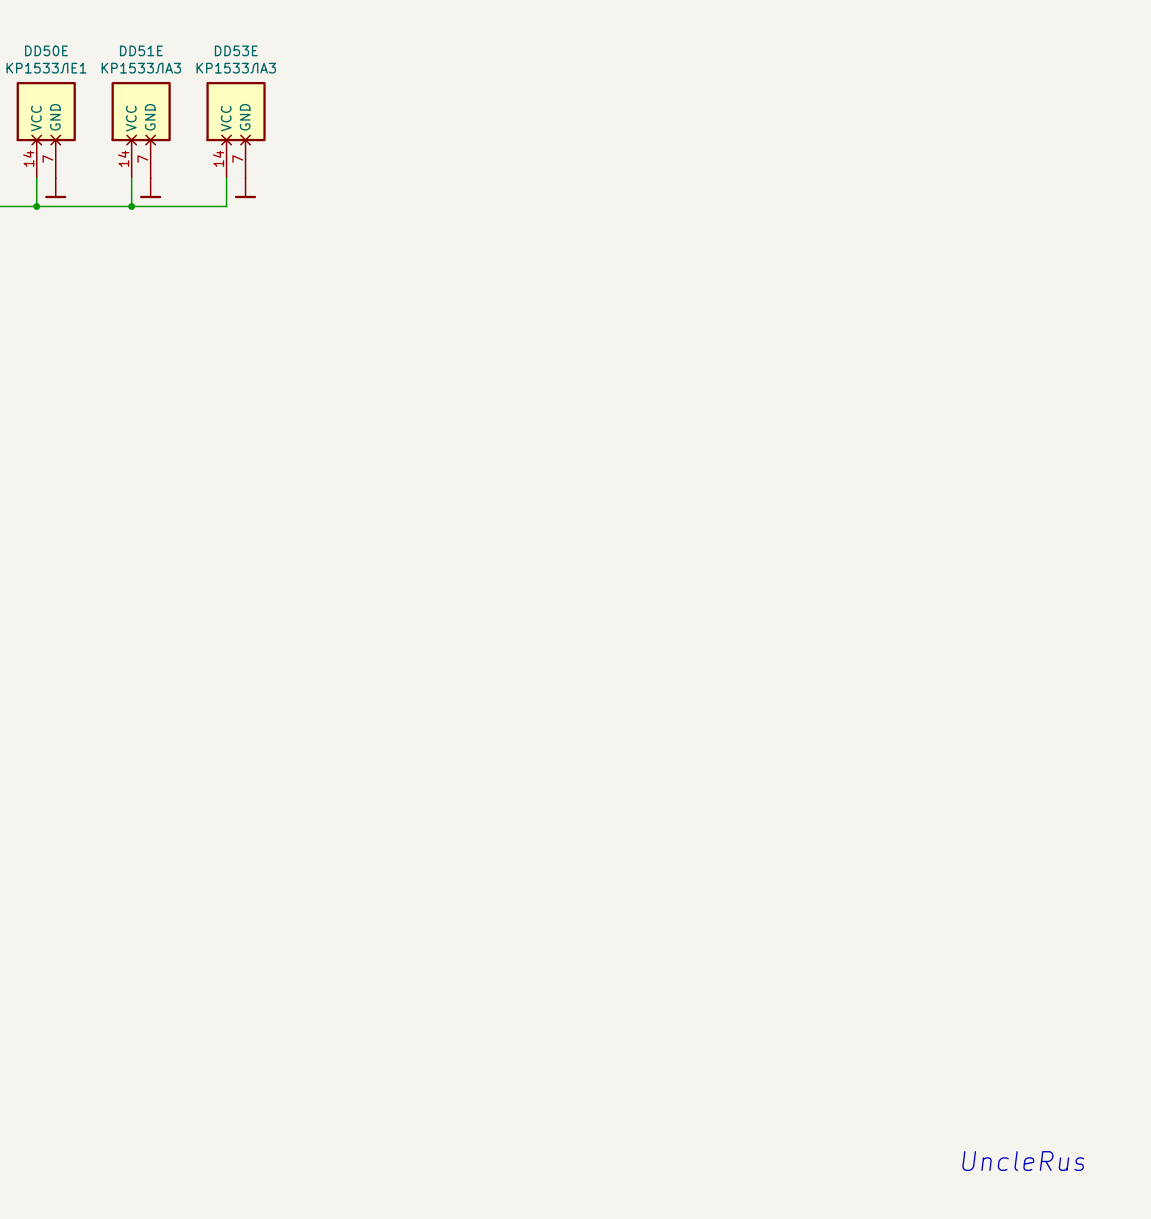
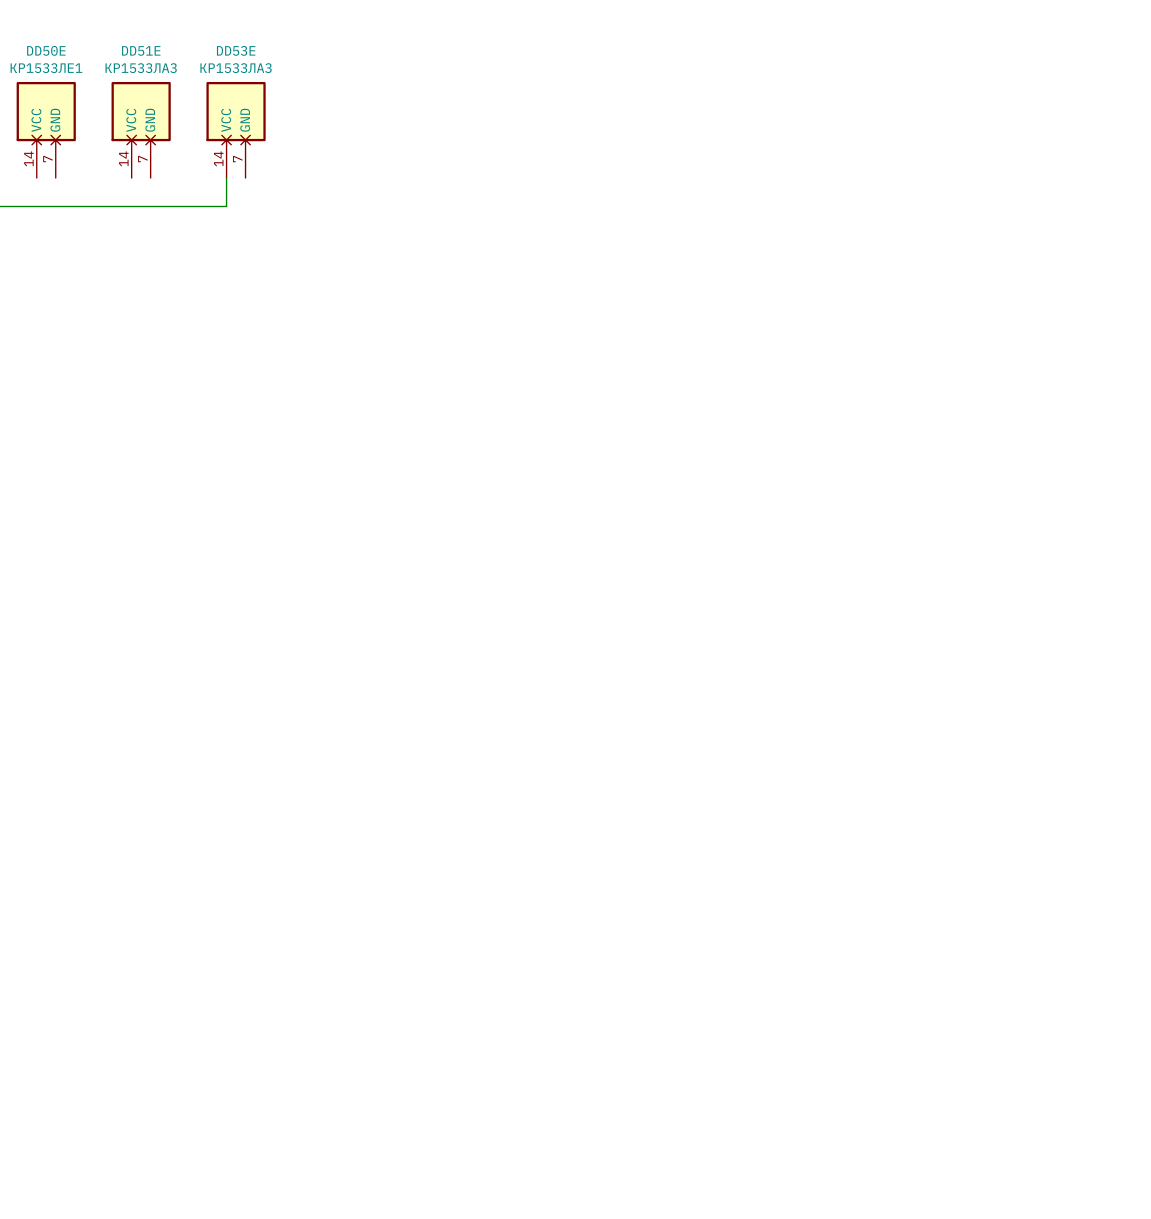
wire: (36, 178) (36, 206) -> none
wire: (131, 178) (131, 206) -> none
power symbol: (55, 188) -> none
power symbol: (150, 188) -> none
power symbol: (245, 188) -> none
junction: (36, 206) -> none
junction: (131, 206) -> none
text: UncleRus (1023, 1161) -> none

